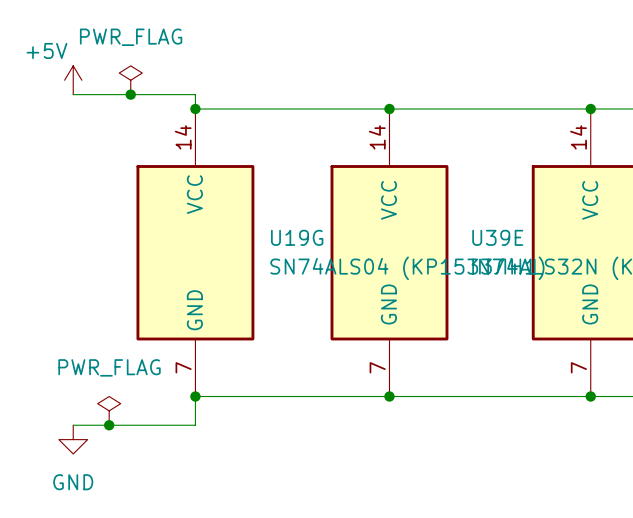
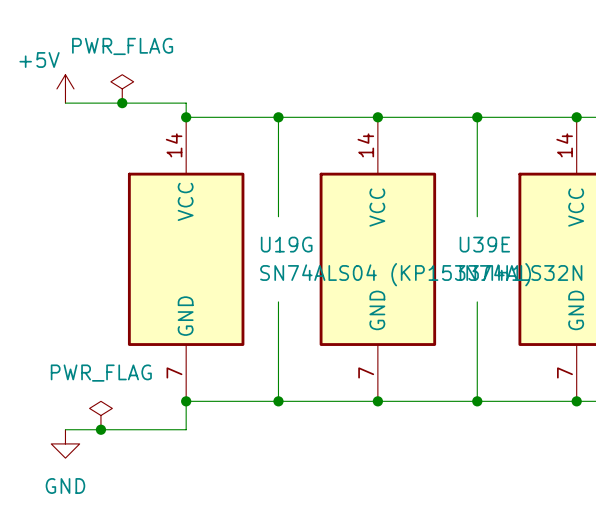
wire: none -> (278, 117) (278, 216)
junction: none -> (278, 117)
wire: none -> (477, 117) (477, 216)
junction: none -> (477, 117)
wire: none -> (278, 301) (278, 401)
wire: none -> (477, 301) (477, 401)
junction: none -> (278, 401)
junction: none -> (477, 401)

